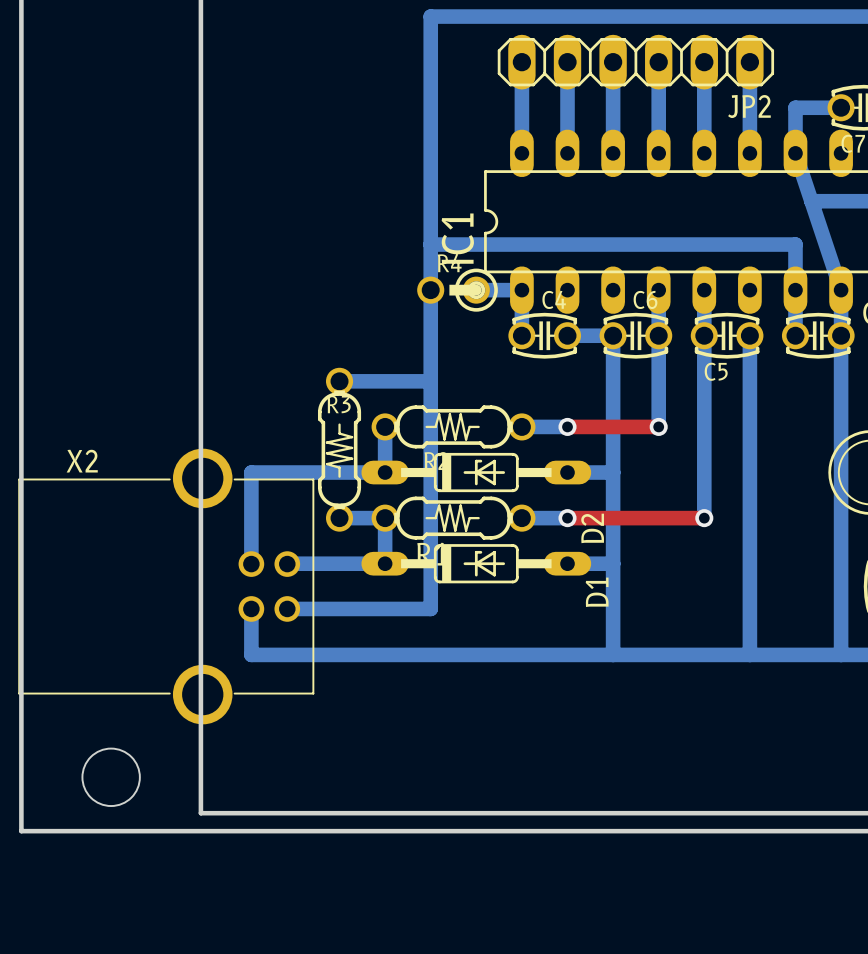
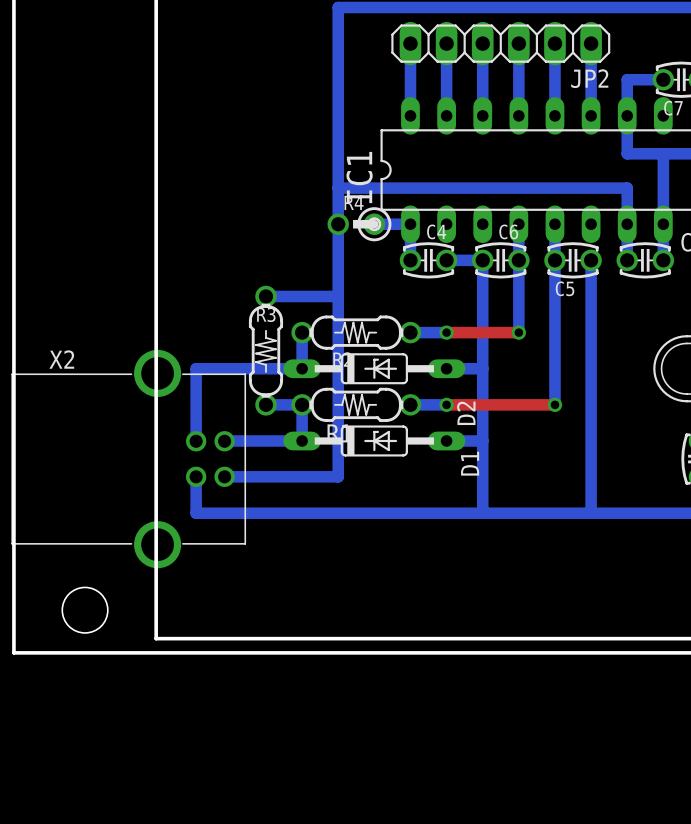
bottom track: (795, 153) (841, 290) -> (663, 153) (663, 224)
bottom track: none -> (627, 115) (627, 153) (639, 153)
bottom track: (841, 335) (841, 654) -> none

